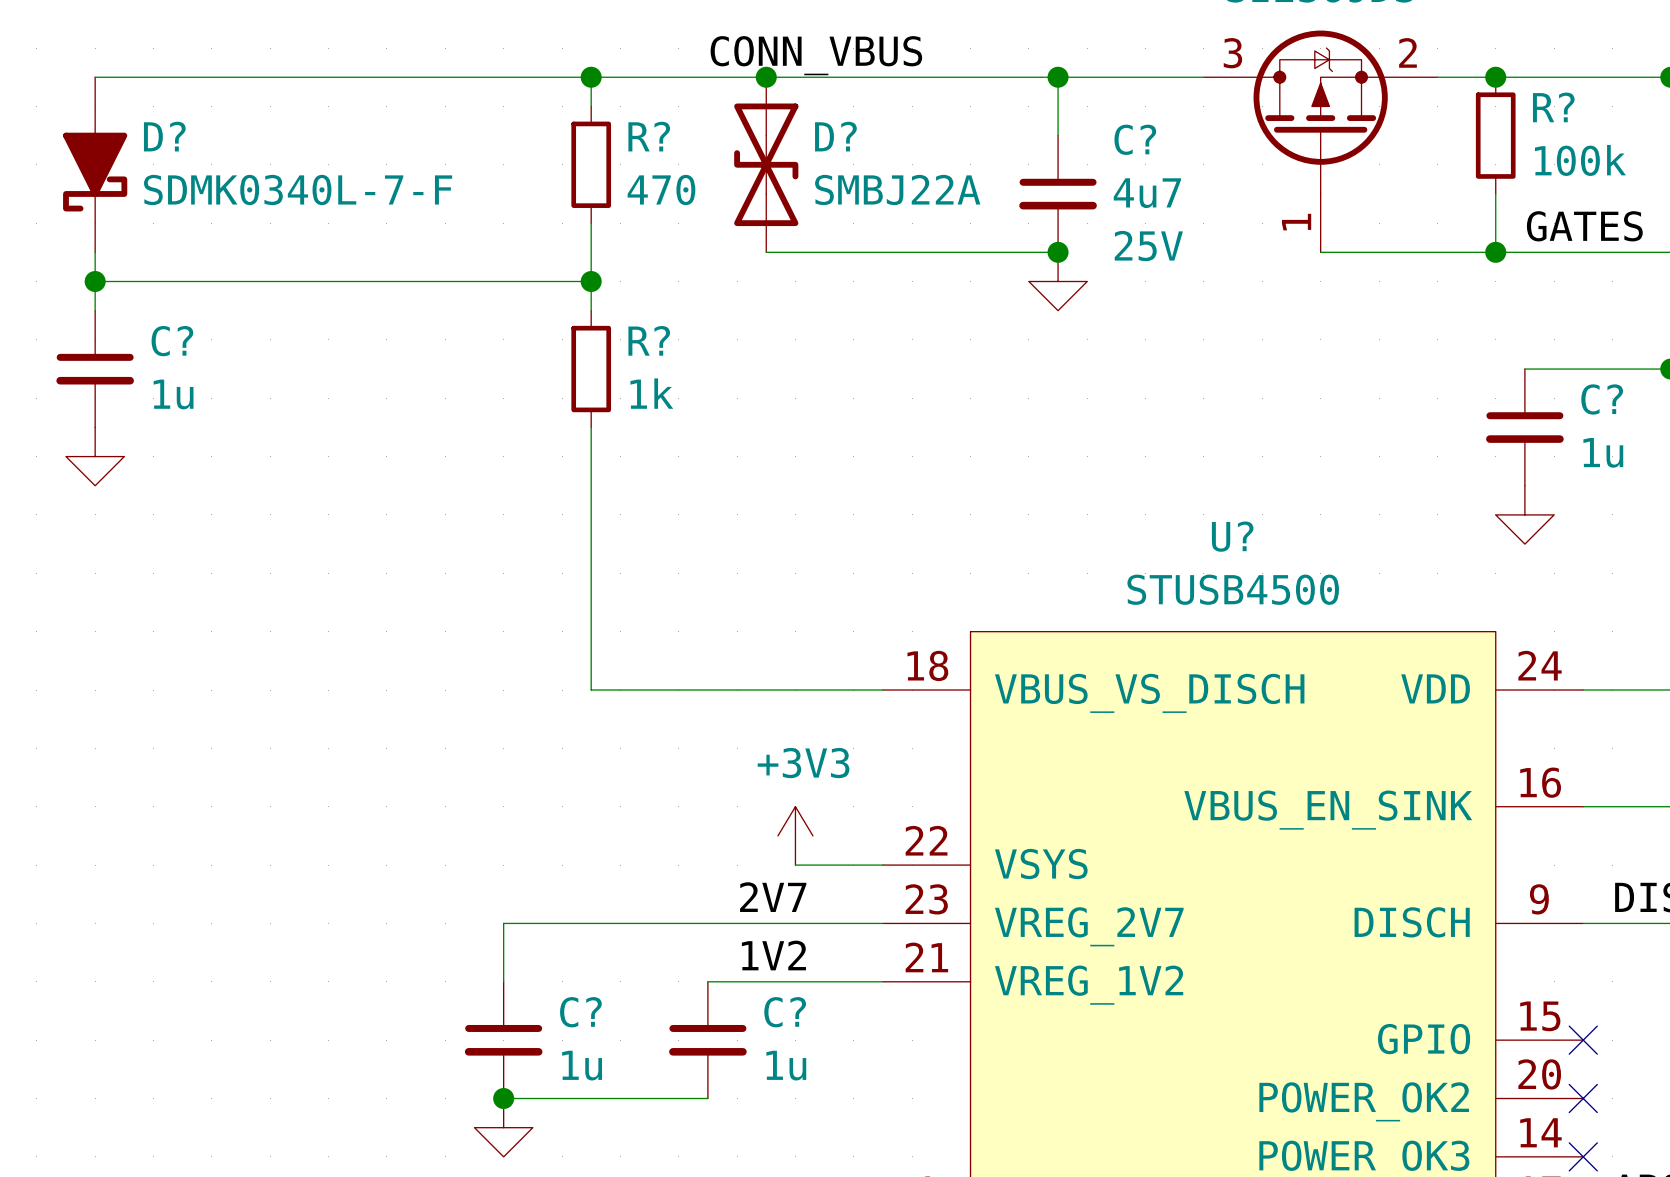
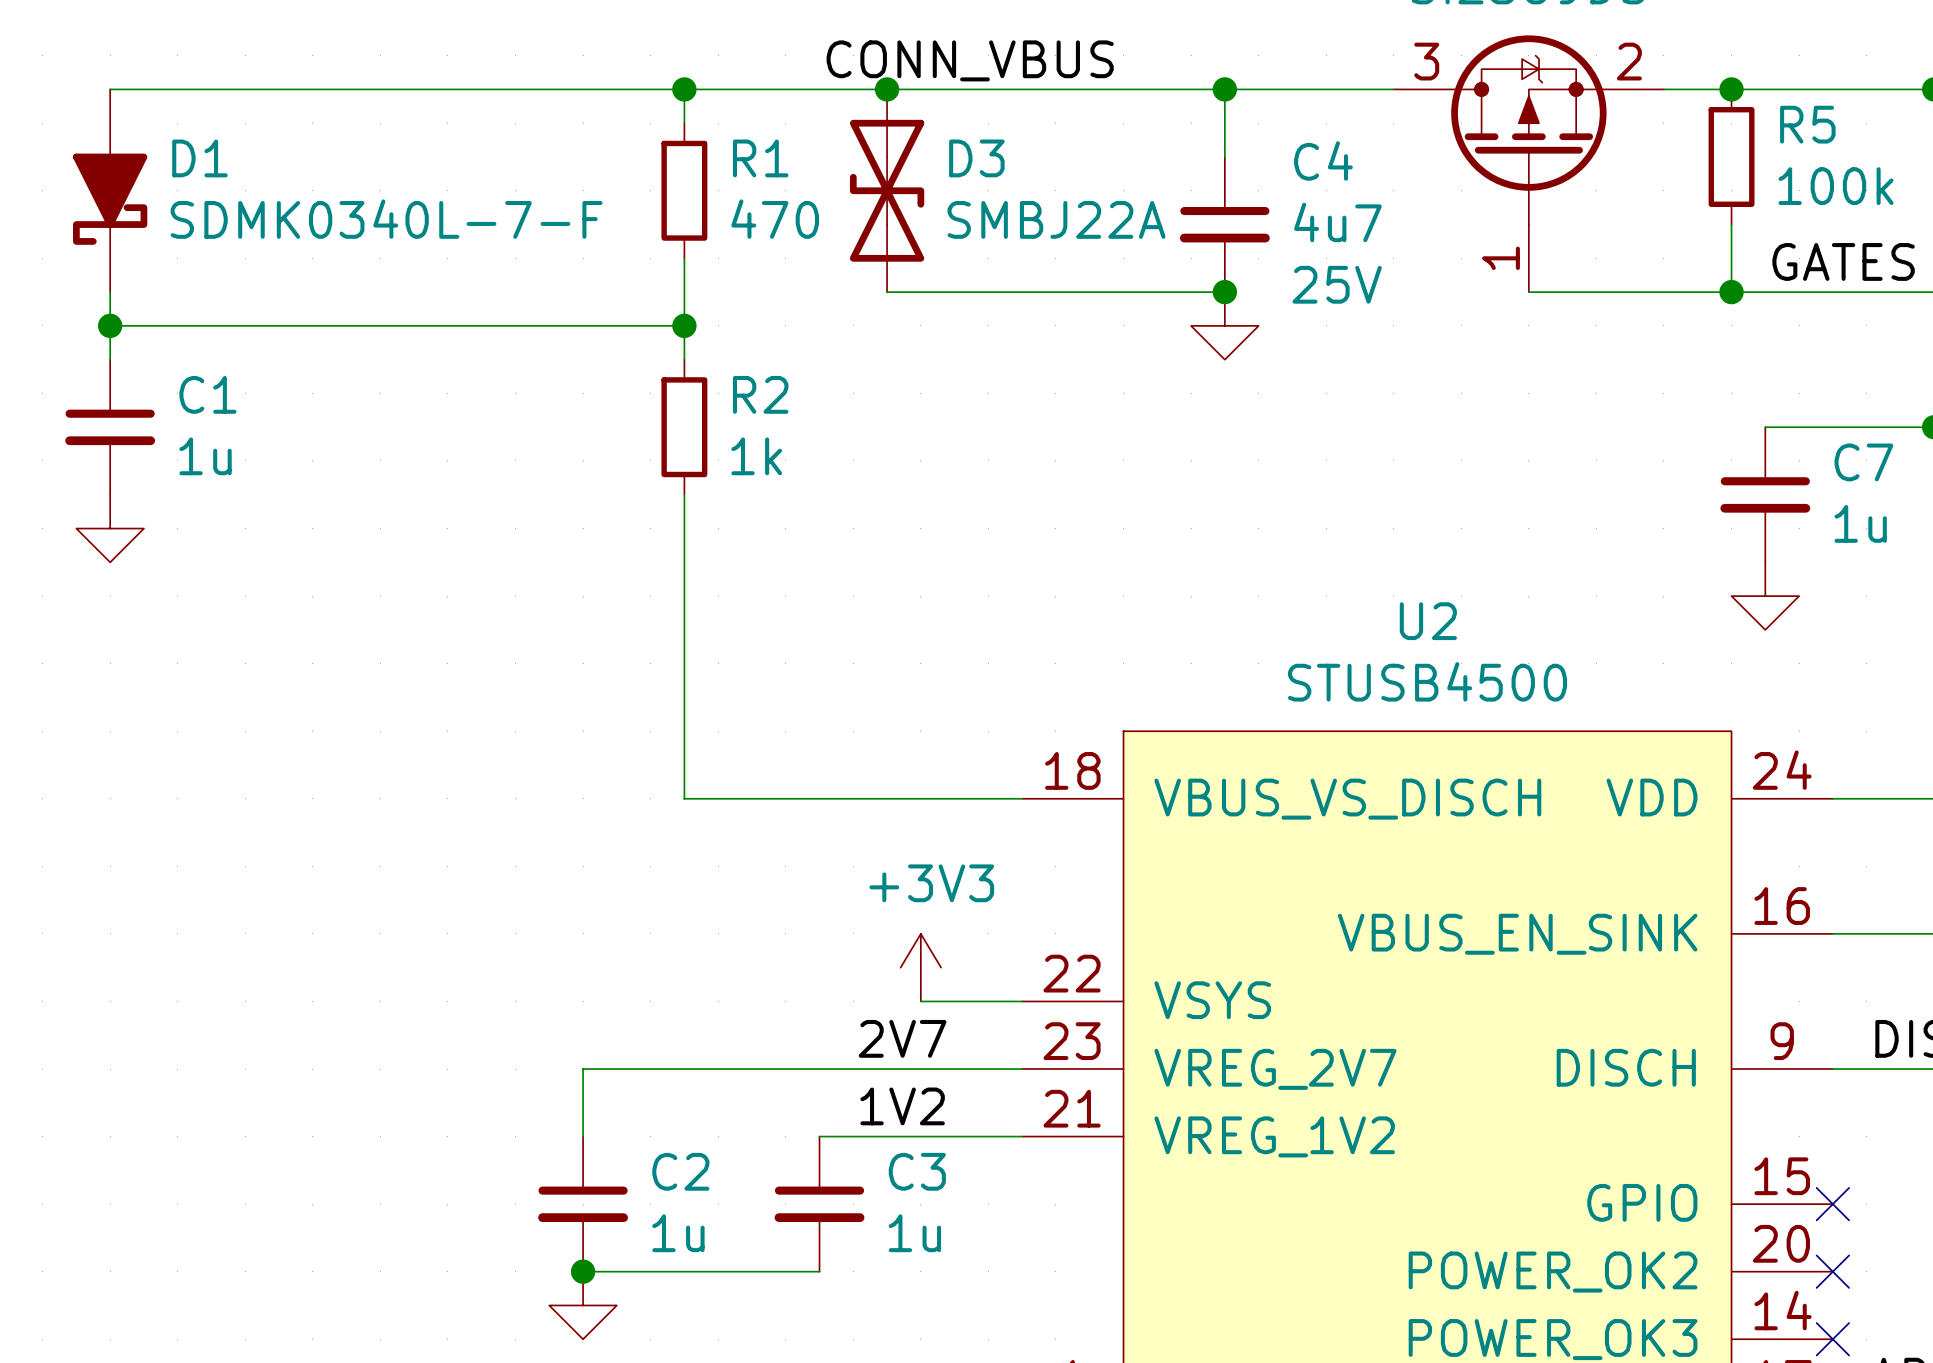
R? name: R? (1553, 107) -> R5 (1807, 124)
D? name: D? (164, 136) -> D1 (199, 158)
R? name: R? (649, 136) -> R1 (760, 158)
D? name: D? (835, 136) -> D3 (976, 158)
C? name: C? (1135, 139) -> C4 (1323, 161)
R? name: R? (649, 340) -> R2 (760, 394)
C? name: C? (172, 341) -> C1 (207, 394)
C? name: C? (1602, 399) -> C7 (1863, 462)
U? name: U? (1232, 536) -> U2 (1428, 621)
C? name: C? (580, 1012) -> C2 (680, 1171)
C? name: C? (785, 1012) -> C3 (917, 1171)

